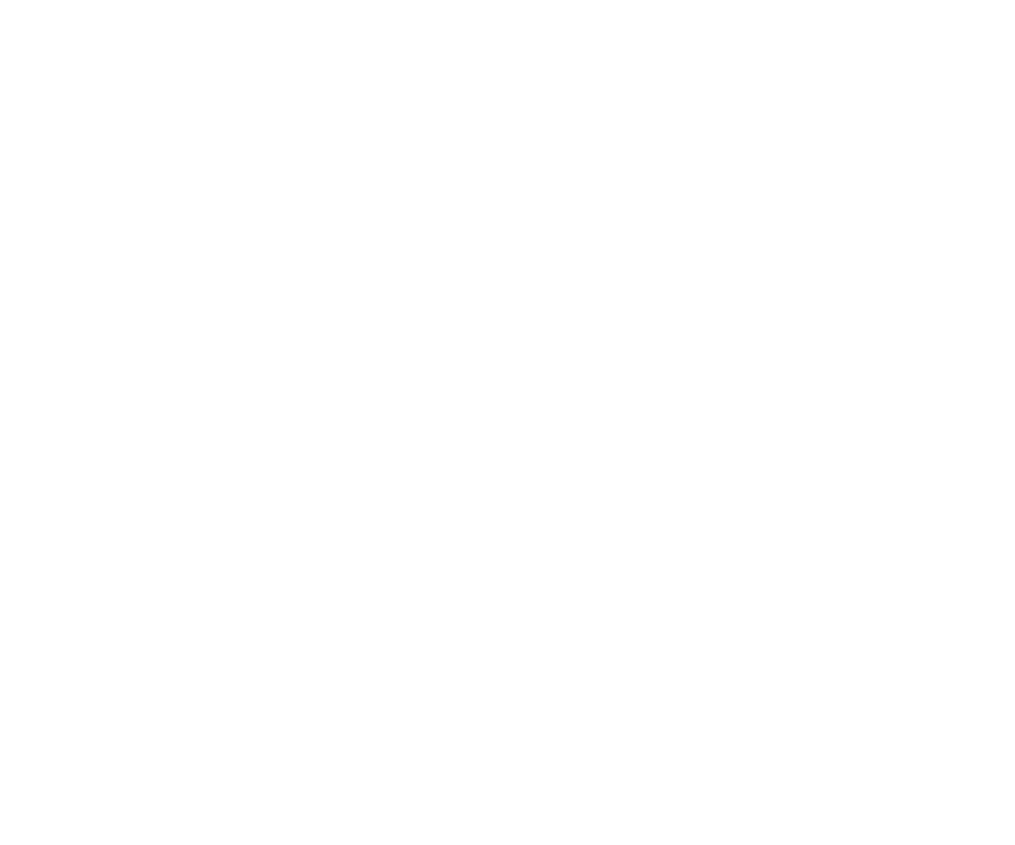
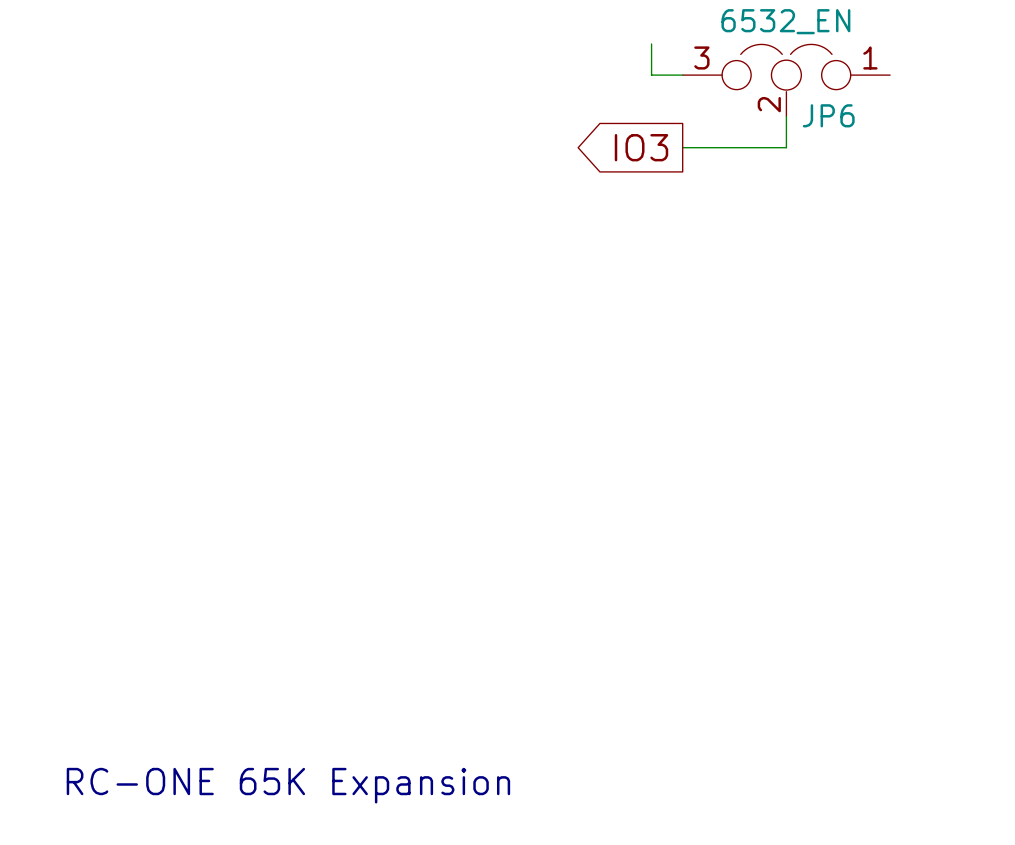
wire: none -> (651, 43) (651, 75) (682, 75)
JP6: none -> 6532_EN (786, 80)
wire: none -> (786, 116) (786, 147) (682, 147)
global label: none -> IO3 (641, 147)
text: none -> RC-ONE 65K Expansion (288, 785)

